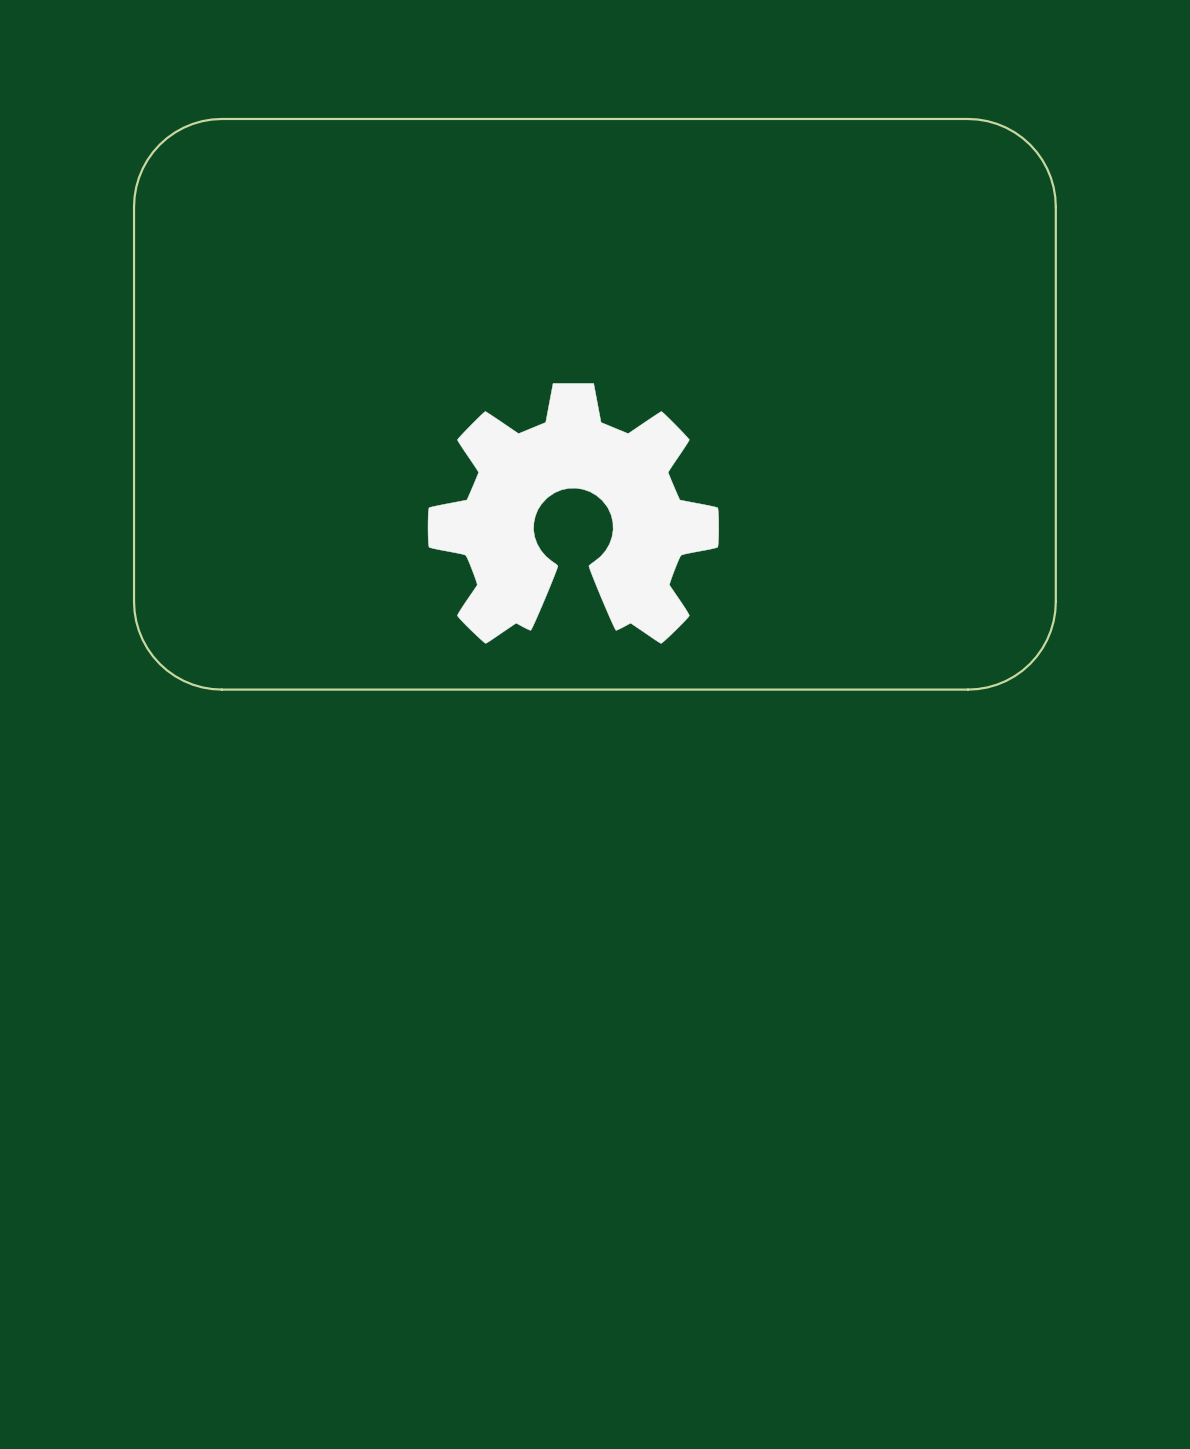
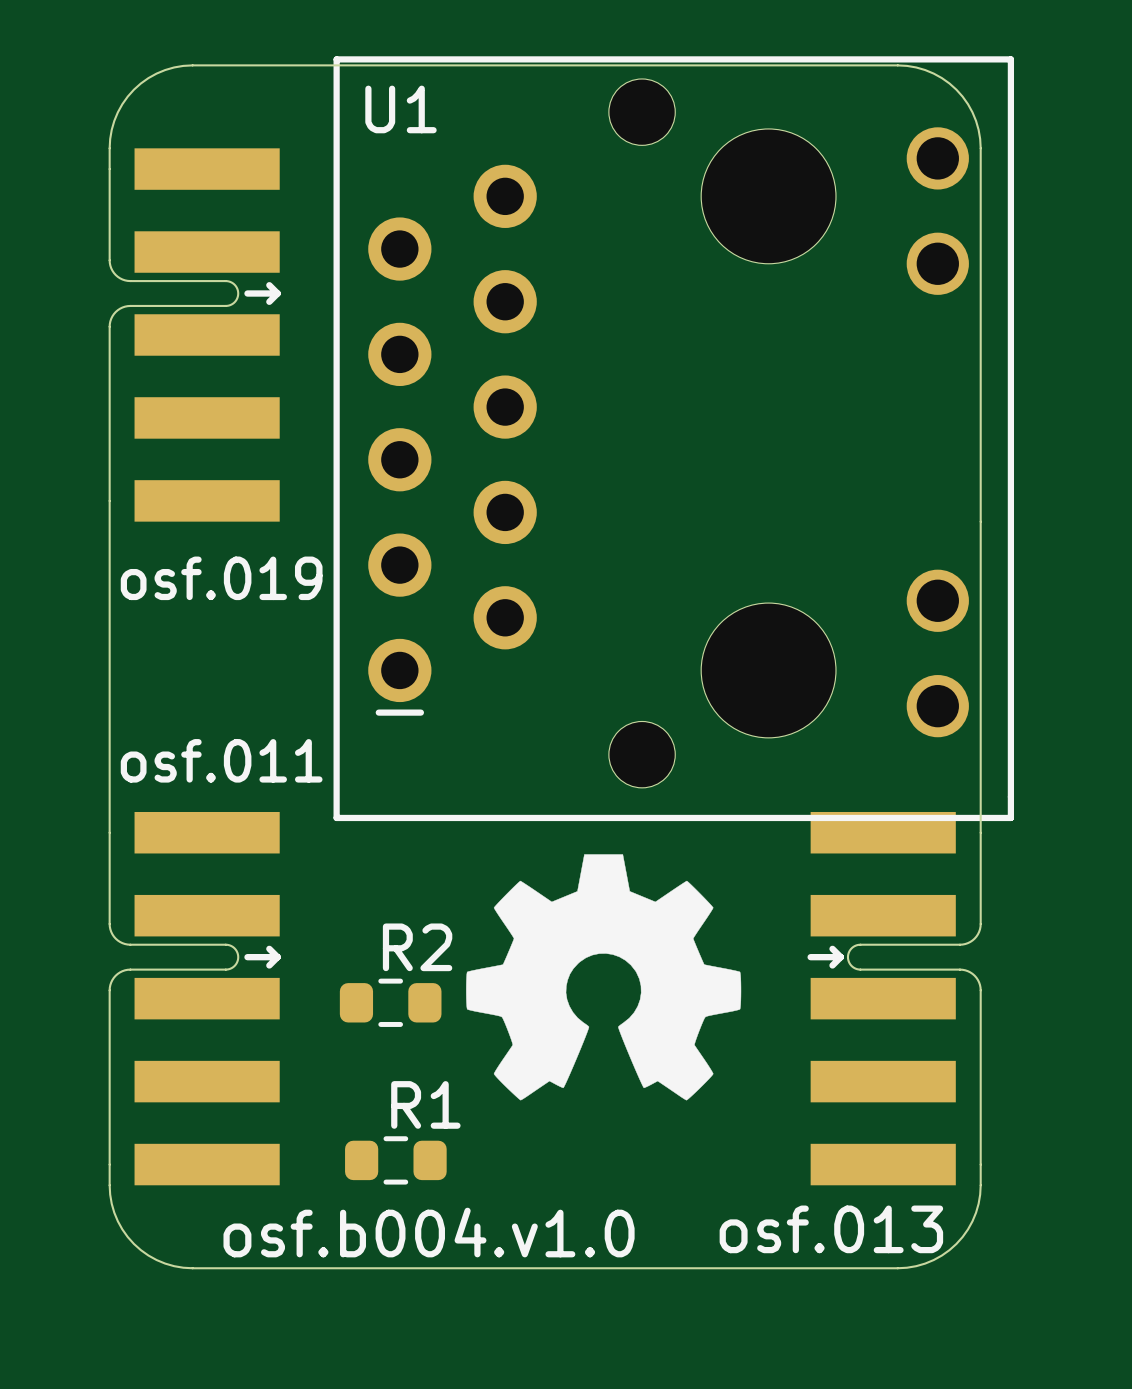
board edge: (134, 228) (134, 579) -> none
part: none -> (194, 334)
drawing position: (573, 513) -> (603, 977)
U1: none -> (673, 438)
board edge: (134, 601) (136, 621) (142, 639) (159, 663) (175, 676) (192, 684) (221, 689) (977, 689) (1006, 680) (1022, 670) (1036, 656) (1050, 630) (1055, 601) -> (109, 521) (109, 832)
board edge: none -> (980, 521) (980, 832)
text: none -> osf.019 (221, 578)
text: none -> osf.011 (221, 760)
part: none -> (194, 998)
part: none -> (894, 998)
R2: none -> (390, 1002)
R1: none -> (395, 1160)
board edge: none -> (109, 1164) (111, 1203) (117, 1221) (127, 1237) (140, 1250) (156, 1260) (174, 1266) (192, 1268) (907, 1267) (933, 1260) (949, 1250) (962, 1237) (972, 1221) (978, 1203) (980, 1164)
text: none -> osf.013 (831, 1229)
text: none -> osf.b004.v1.0 (429, 1232)

